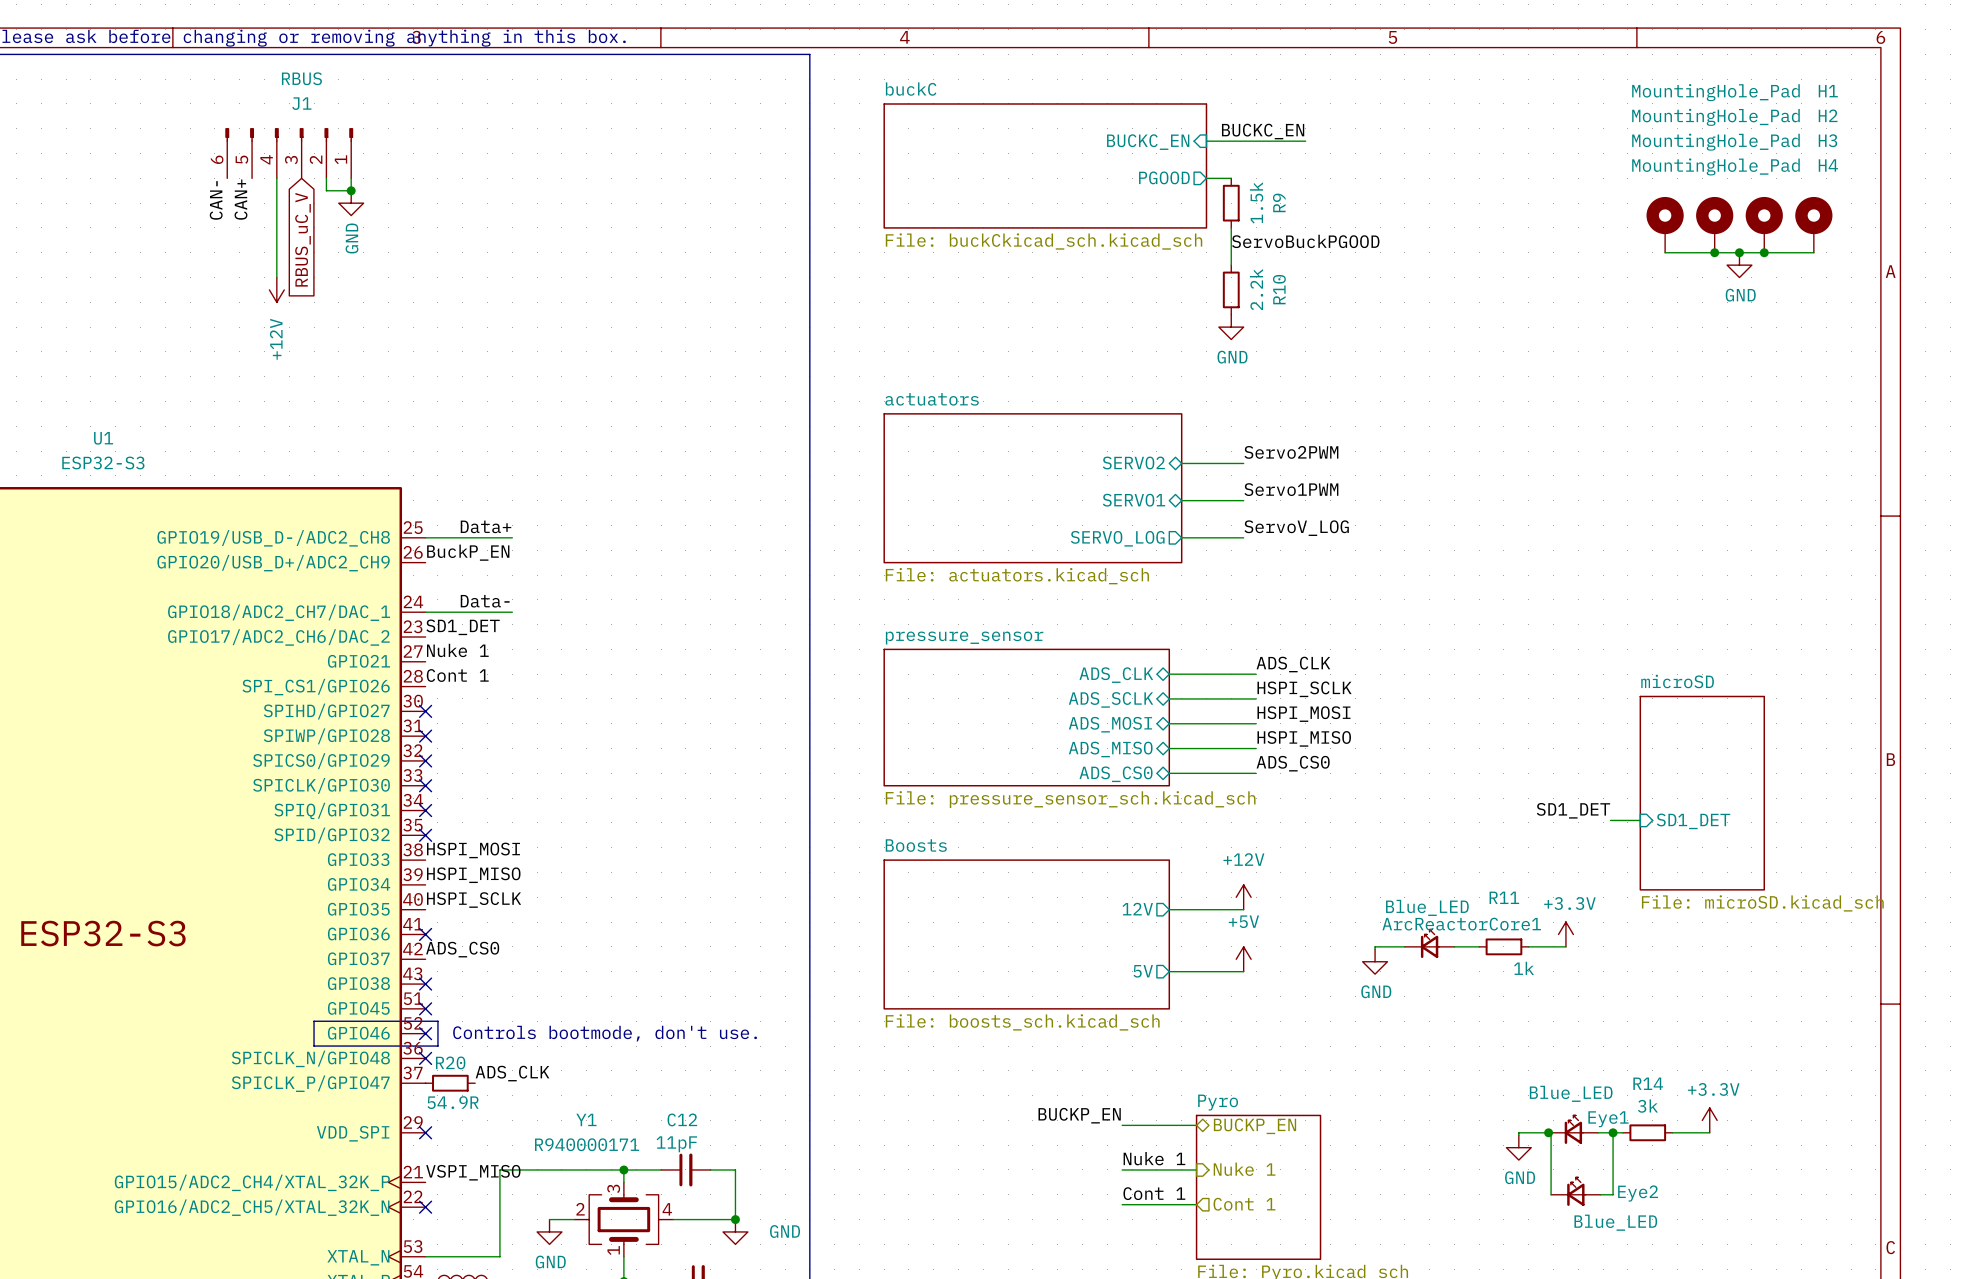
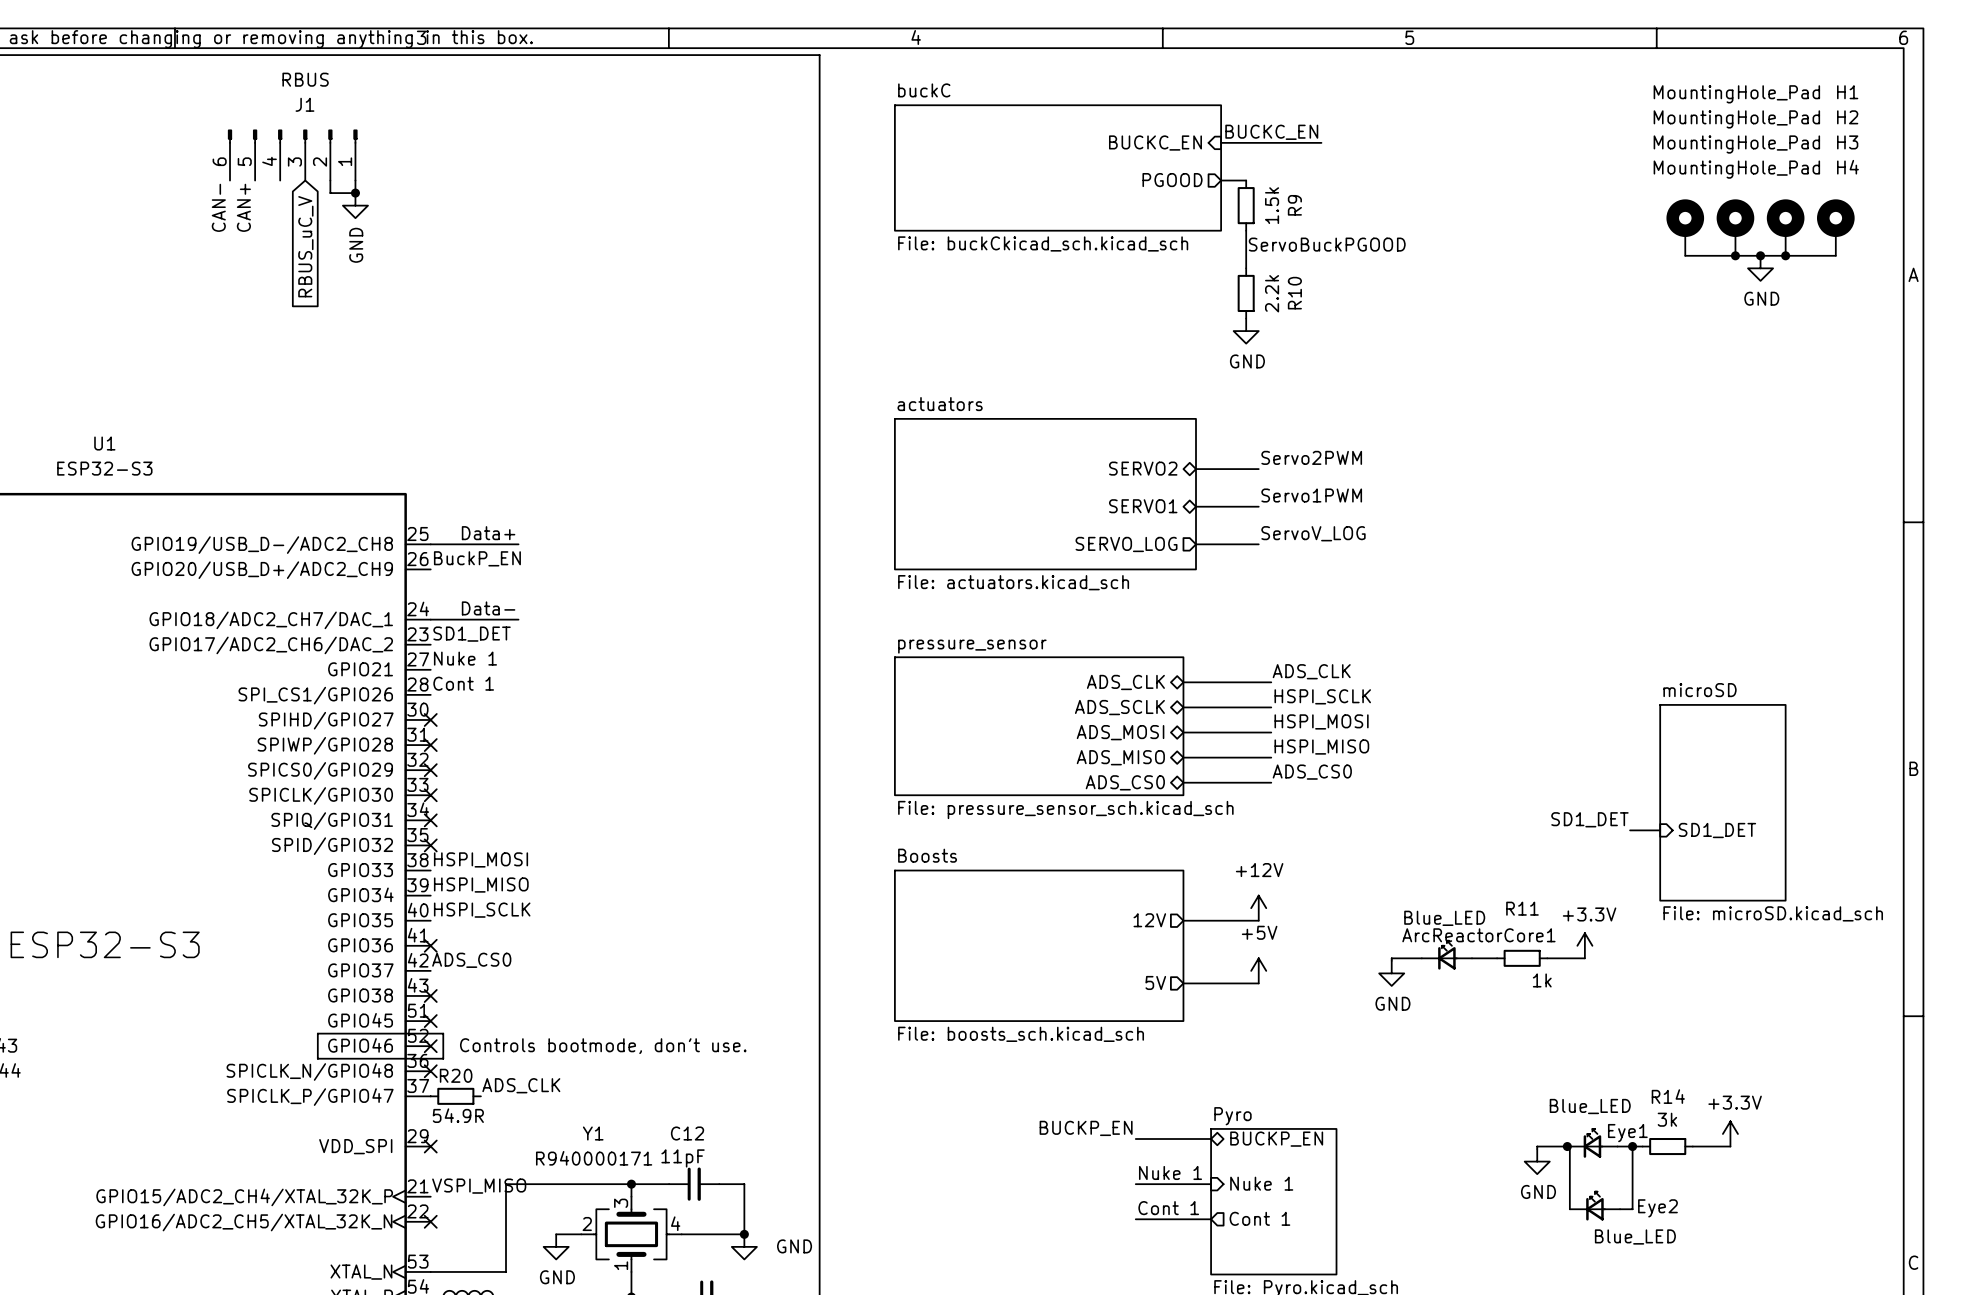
wire: (276, 178) (276, 277) -> none
power symbol: +12V (276, 289) -> none

